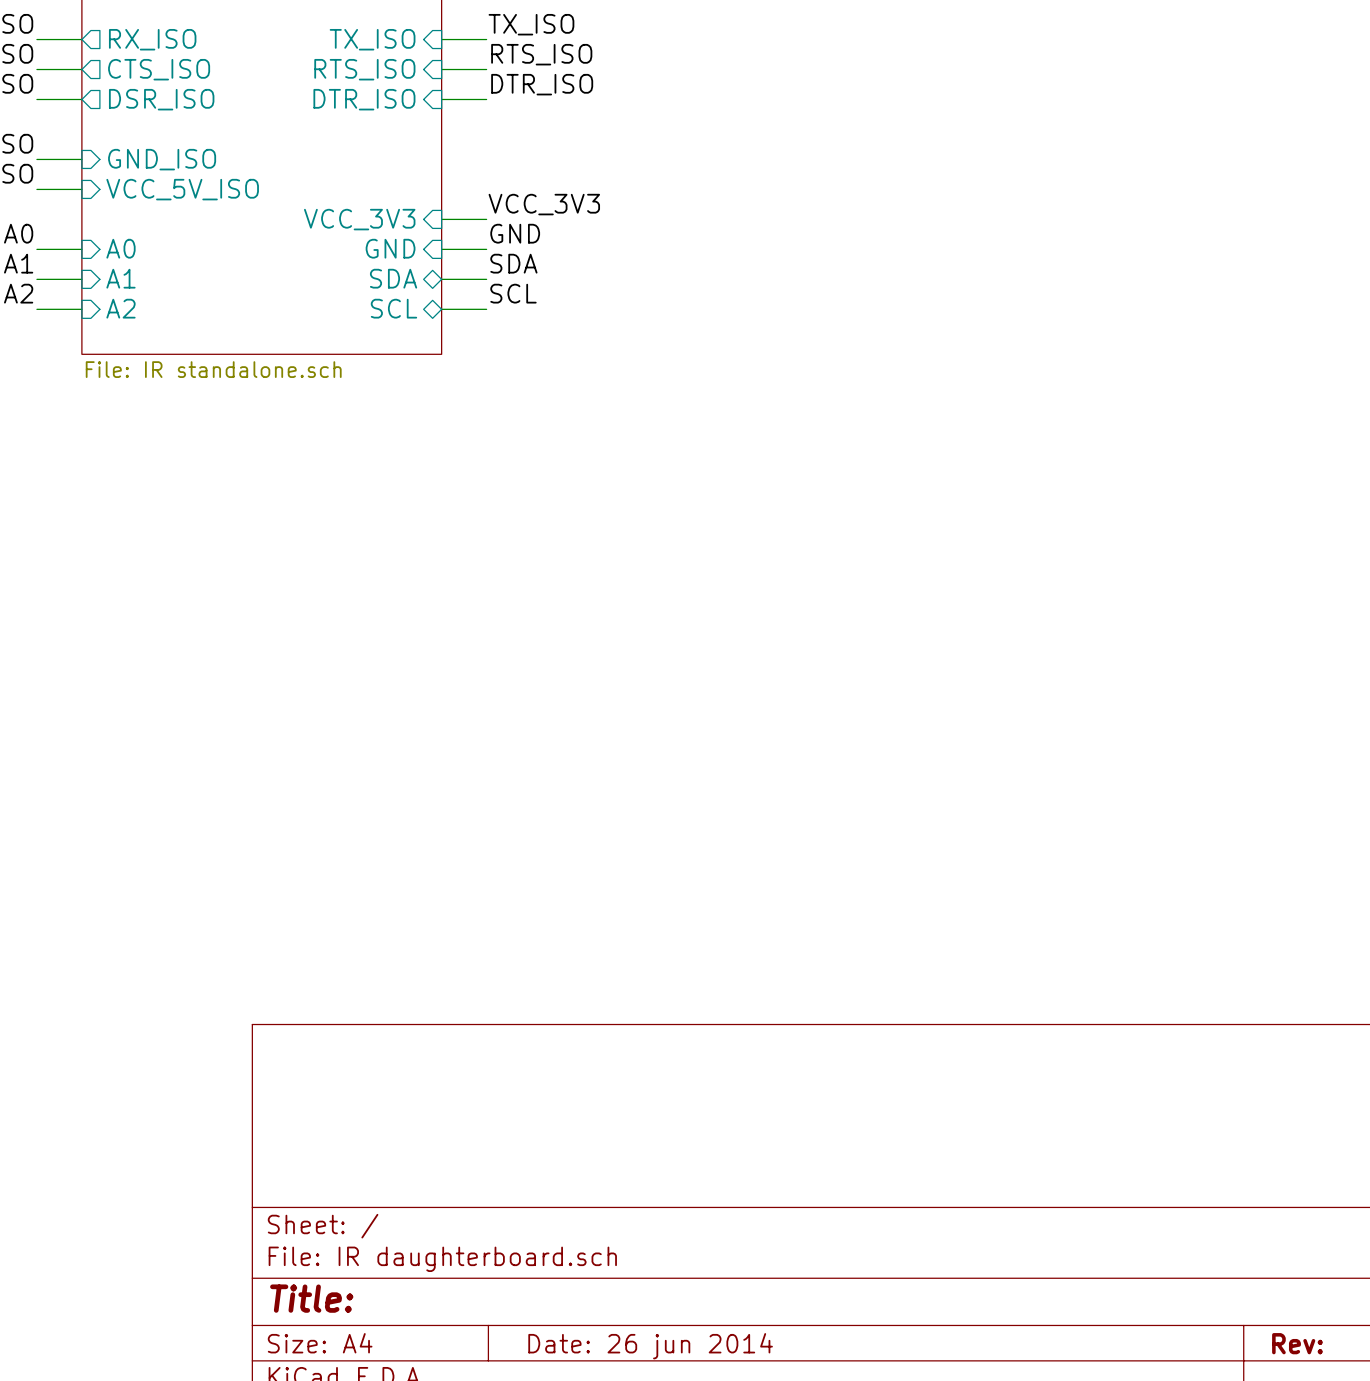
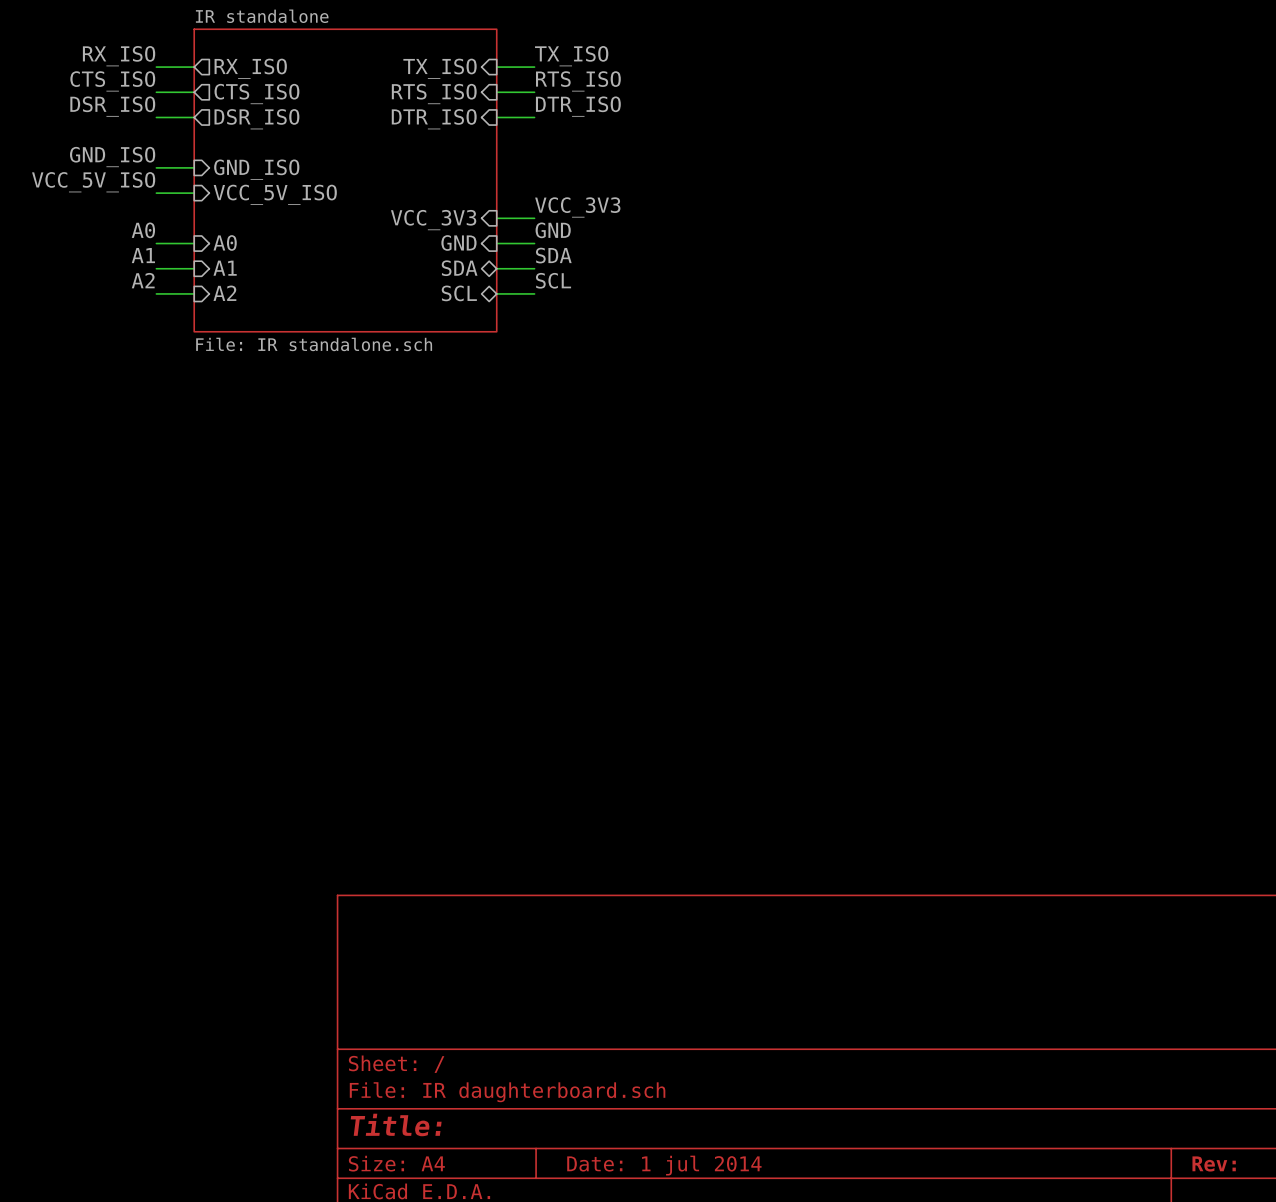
title block: Date: 26 jun 2014 (650, 1346) -> Date: 1 jul 2014 (664, 1165)

